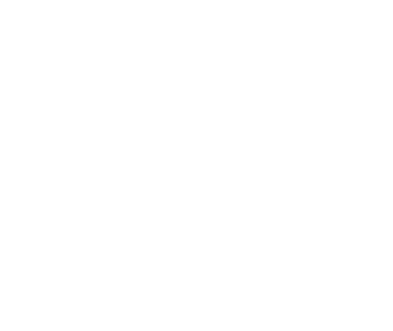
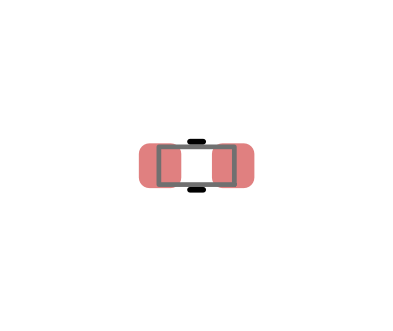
part: none -> (196, 165)

